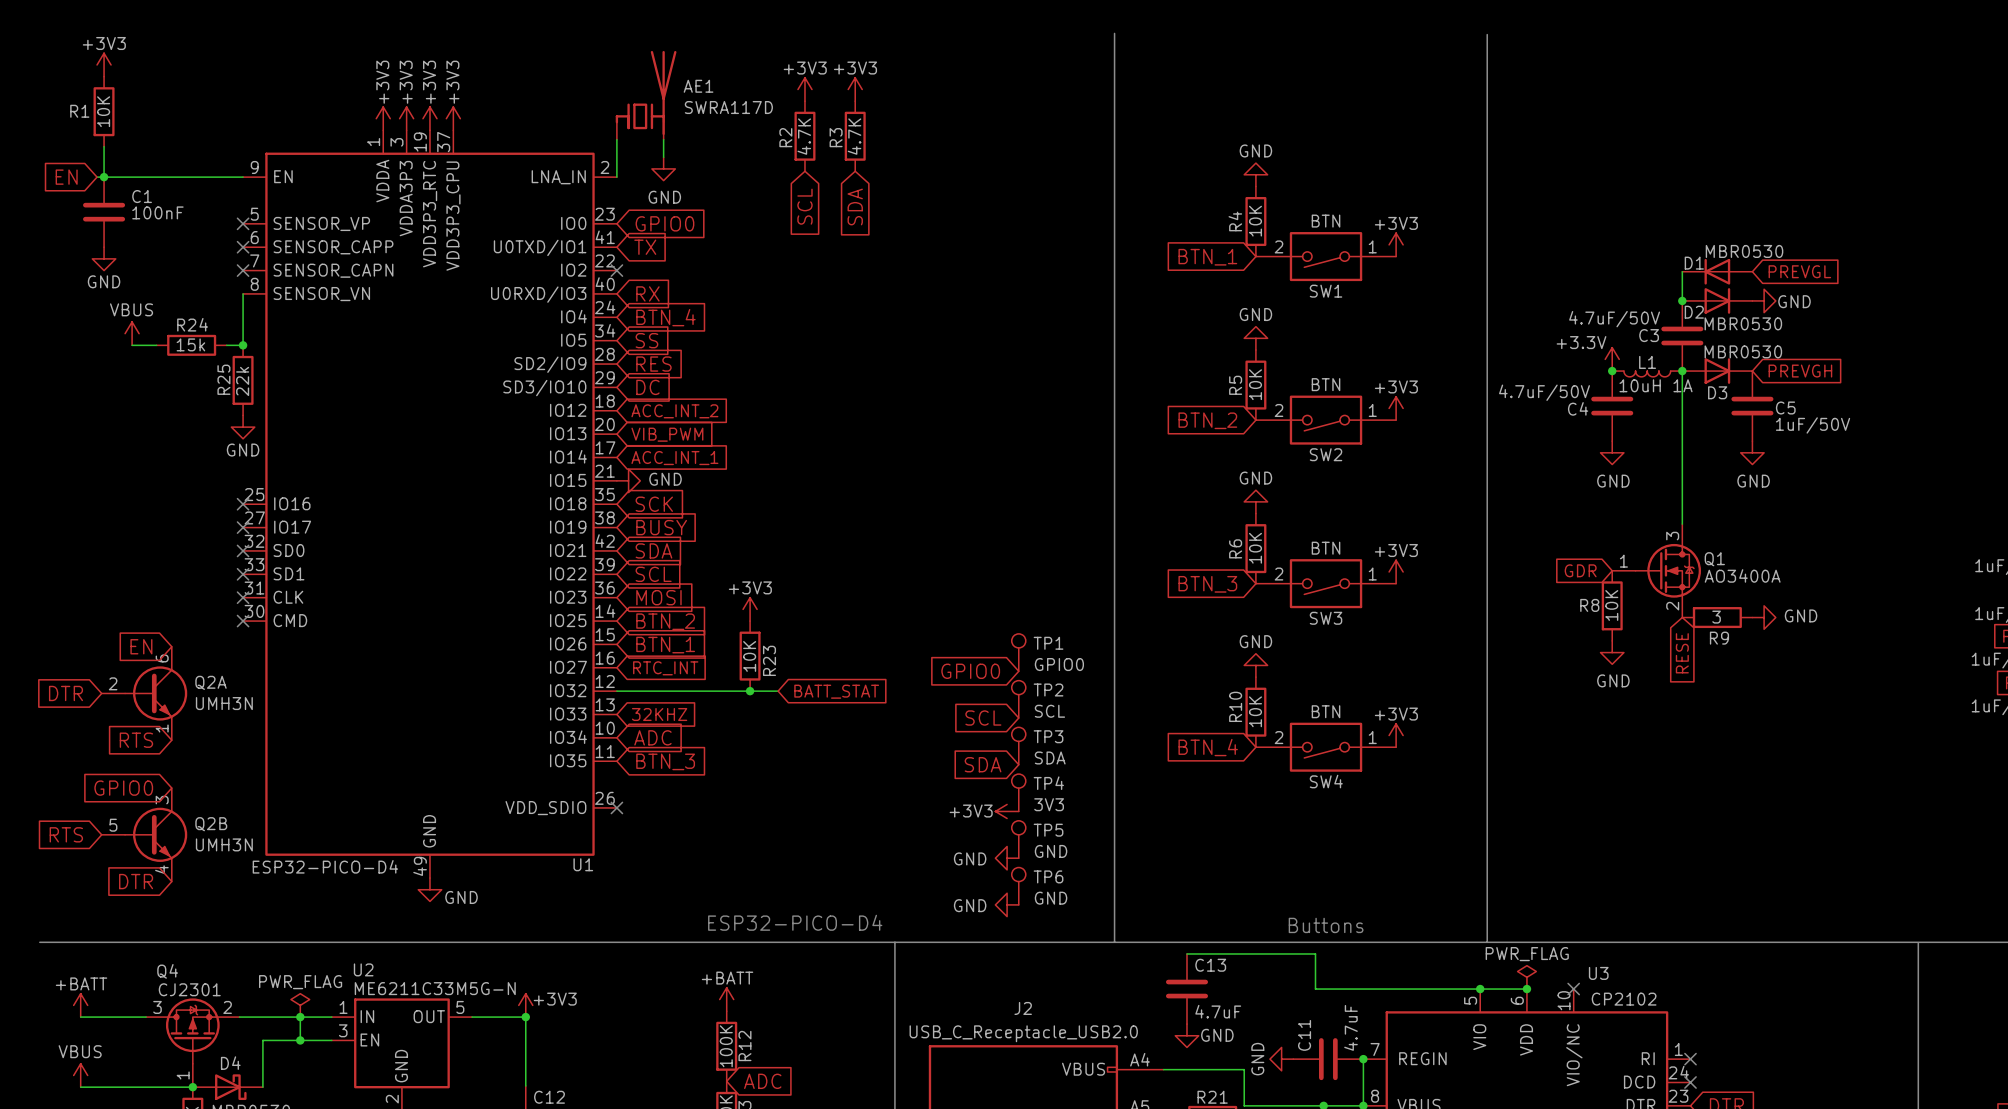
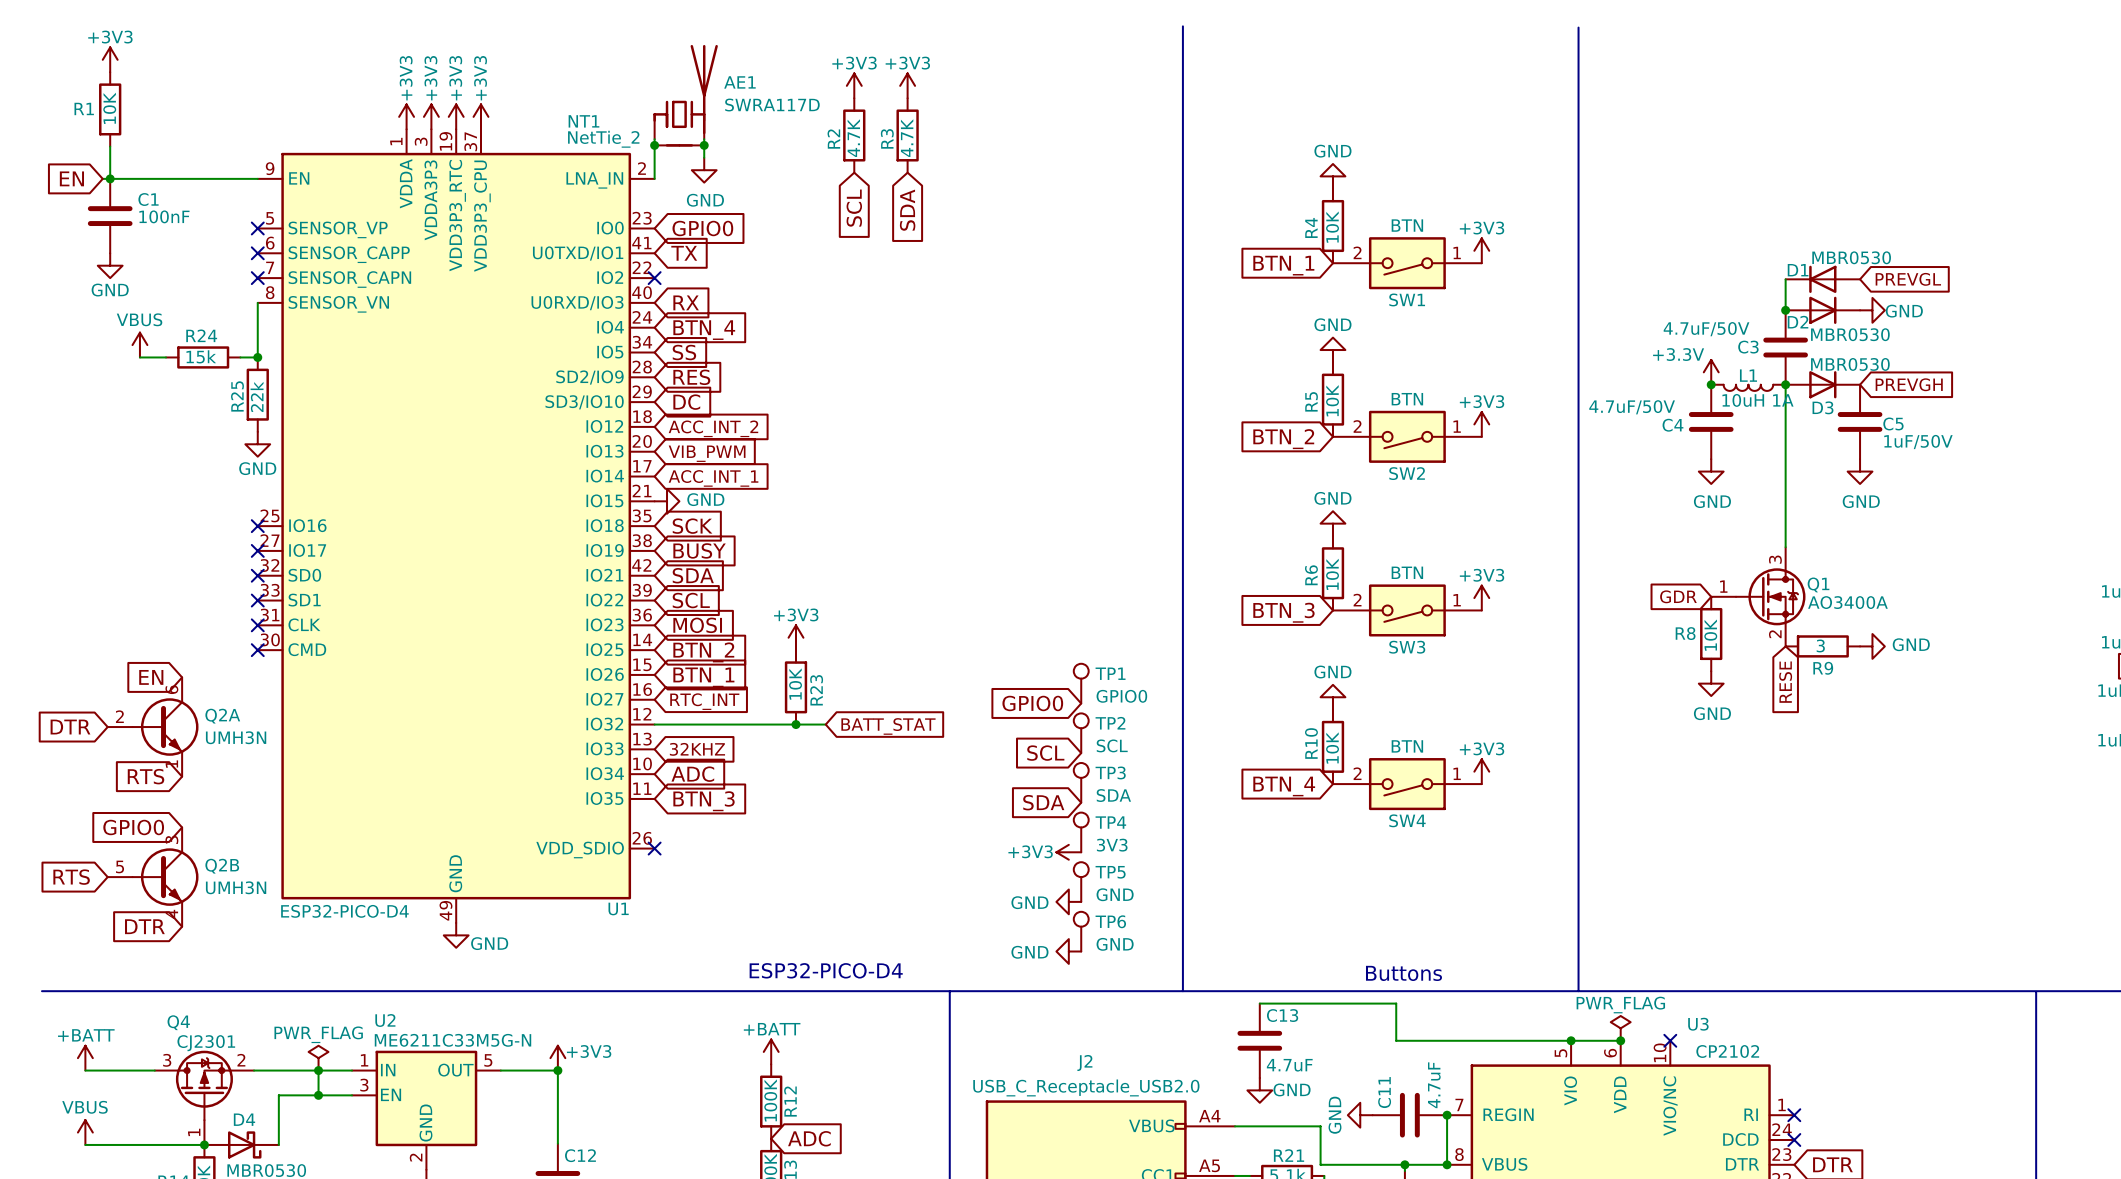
junction: none -> (654, 145)
NT1: none -> NetTie_2 (679, 145)
junction: none -> (704, 145)

